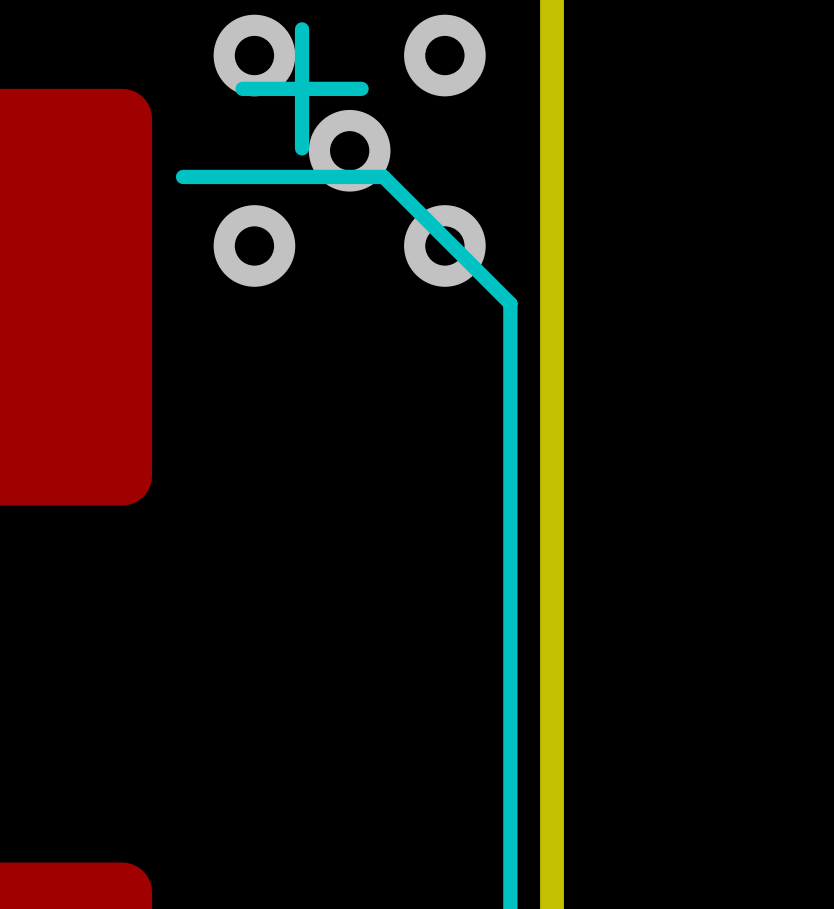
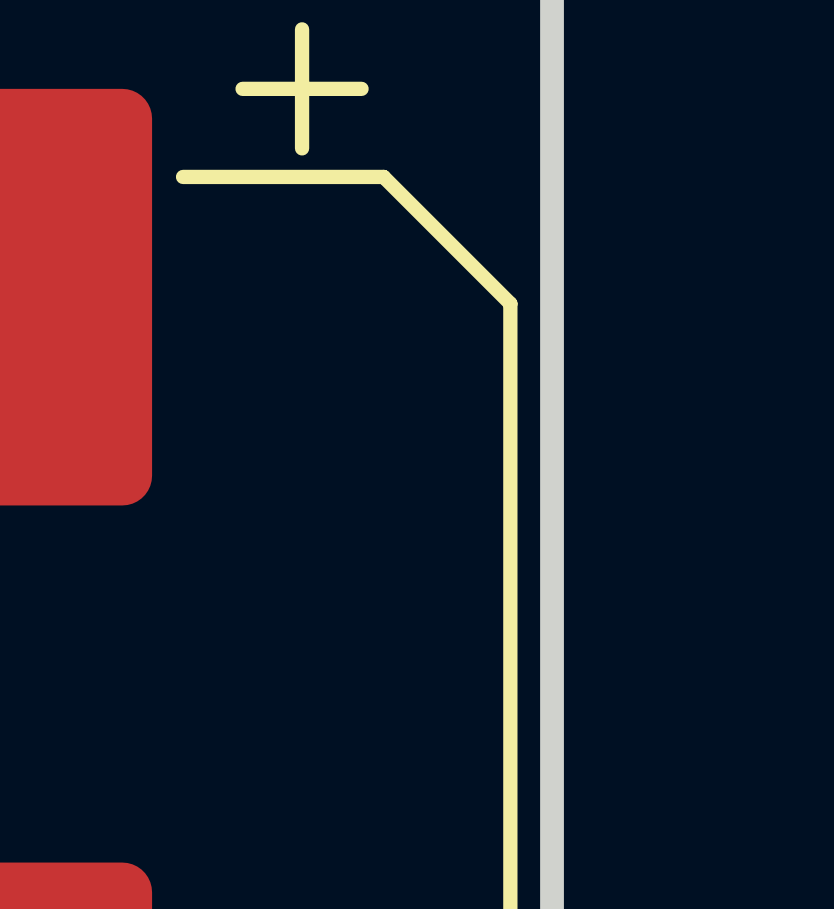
via: (254, 55) -> none
via: (444, 55) -> none
via: (349, 150) -> none
via: (254, 245) -> none
via: (444, 245) -> none

